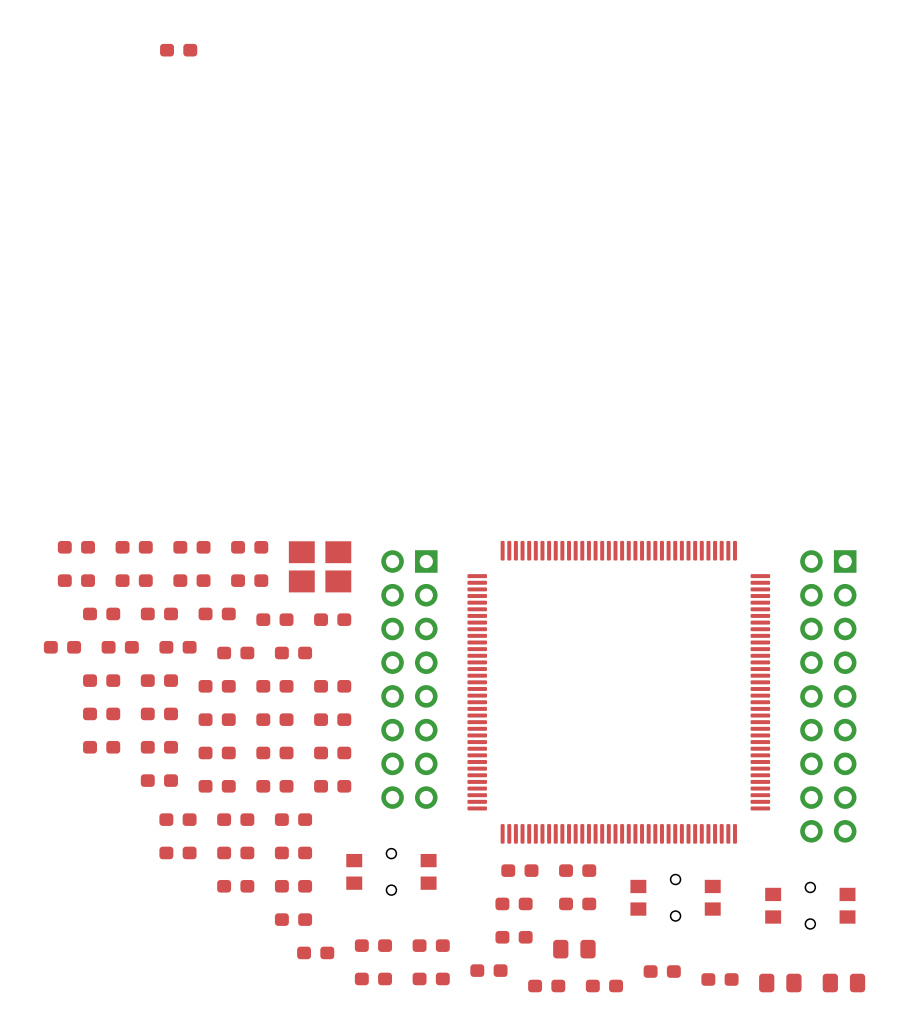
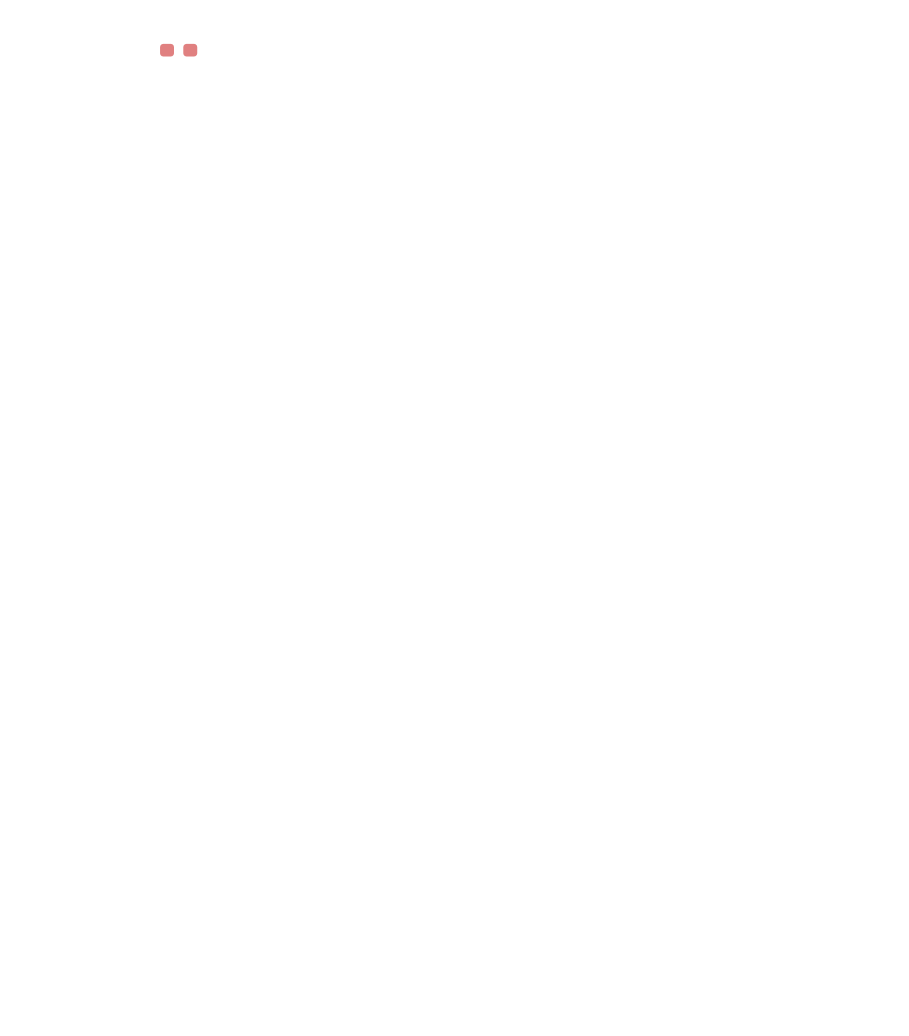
part: (76, 547) -> none
part: (134, 547) -> none
part: (191, 547) -> none
part: (249, 547) -> none
part: (320, 566) -> none
part: (76, 580) -> none
part: (134, 580) -> none
part: (191, 580) -> none
part: (249, 580) -> none
part: (101, 613) -> none
part: (159, 613) -> none
part: (217, 613) -> none
part: (274, 619) -> none
part: (332, 619) -> none
part: (62, 647) -> none
part: (120, 647) -> none
part: (177, 647) -> none
part: (235, 652) -> none
part: (293, 652) -> none
part: (409, 679) -> none
part: (101, 680) -> none
part: (159, 680) -> none
part: (217, 686) -> none
part: (274, 686) -> none
part: (332, 686) -> none
part: (618, 692) -> none
part: (828, 696) -> none
part: (101, 713) -> none
part: (159, 713) -> none
part: (217, 719) -> none
part: (274, 719) -> none
part: (332, 719) -> none
part: (101, 747) -> none
part: (159, 747) -> none
part: (217, 752) -> none
part: (274, 752) -> none
part: (332, 752) -> none
part: (159, 780) -> none
part: (217, 786) -> none
part: (274, 786) -> none
part: (332, 786) -> none
part: (177, 819) -> none
part: (235, 819) -> none
part: (293, 819) -> none
part: (177, 852) -> none
part: (235, 852) -> none
part: (293, 852) -> none
part: (519, 870) -> none
part: (577, 870) -> none
part: (391, 871) -> none
part: (235, 886) -> none
part: (293, 886) -> none
part: (675, 897) -> none
part: (514, 903) -> none
part: (577, 903) -> none
part: (810, 905) -> none
part: (293, 919) -> none
part: (514, 937) -> none
part: (373, 945) -> none
part: (431, 945) -> none
part: (574, 949) -> none
part: (315, 952) -> none
part: (488, 970) -> none
part: (662, 971) -> none
part: (373, 978) -> none
part: (431, 978) -> none
part: (719, 979) -> none
part: (780, 983) -> none
part: (843, 983) -> none
part: (546, 985) -> none
part: (604, 985) -> none

